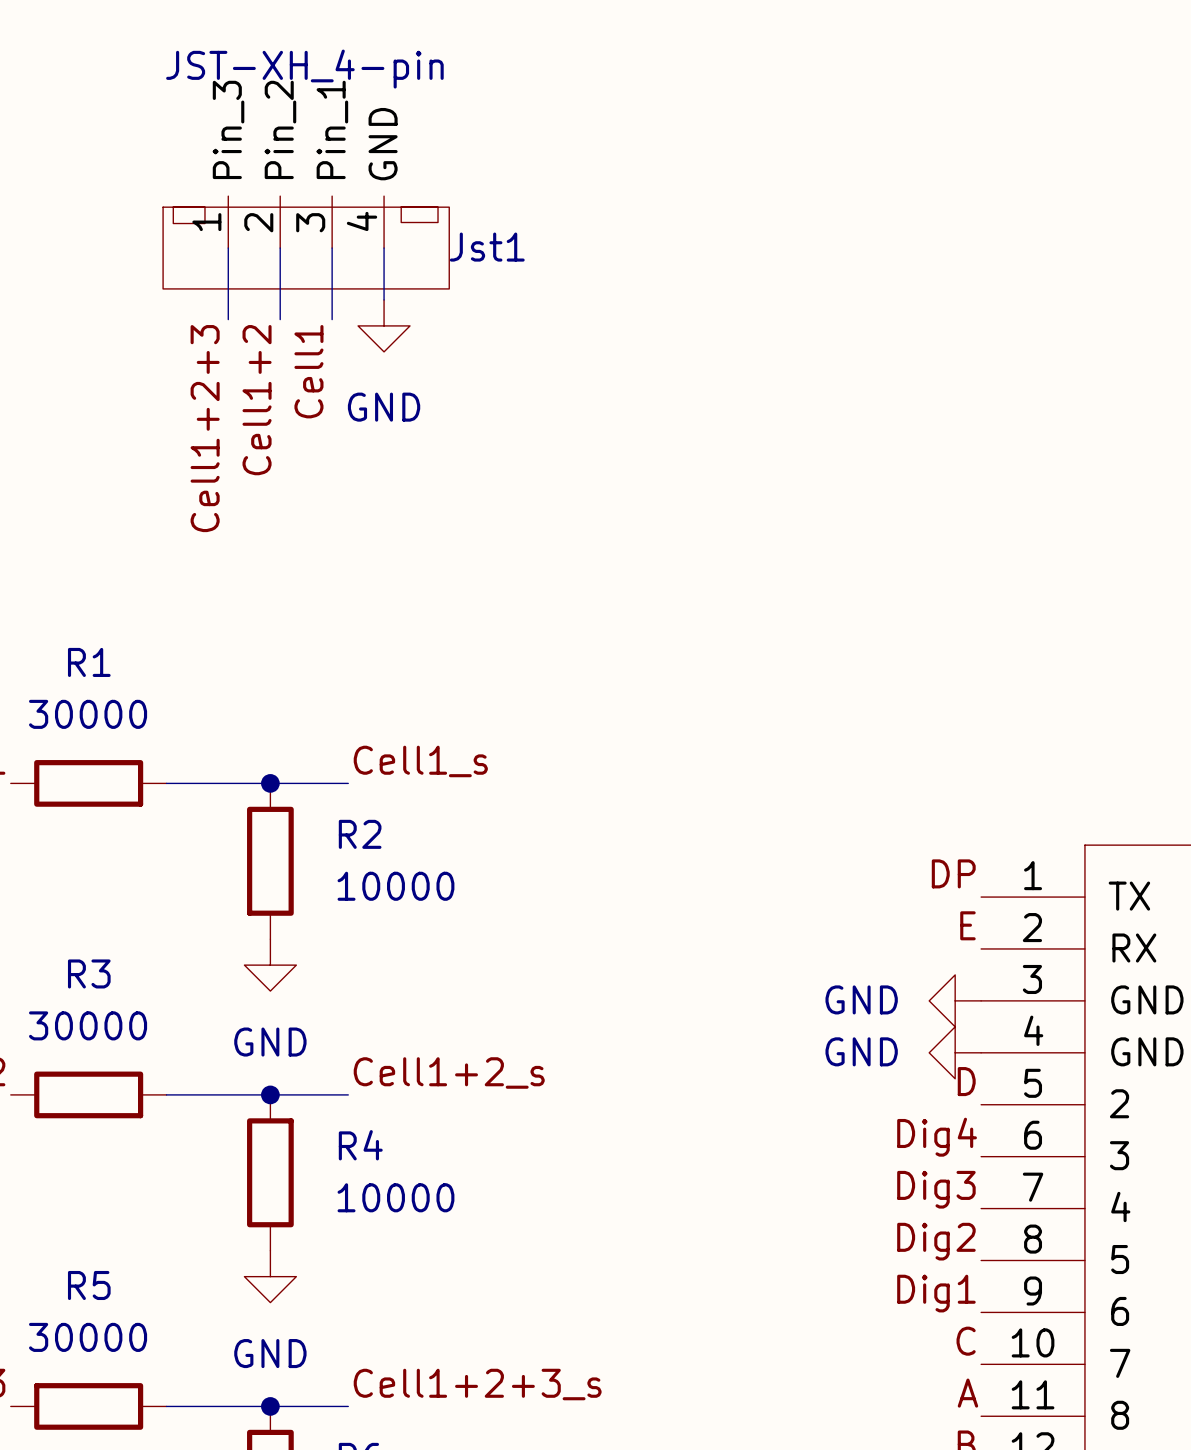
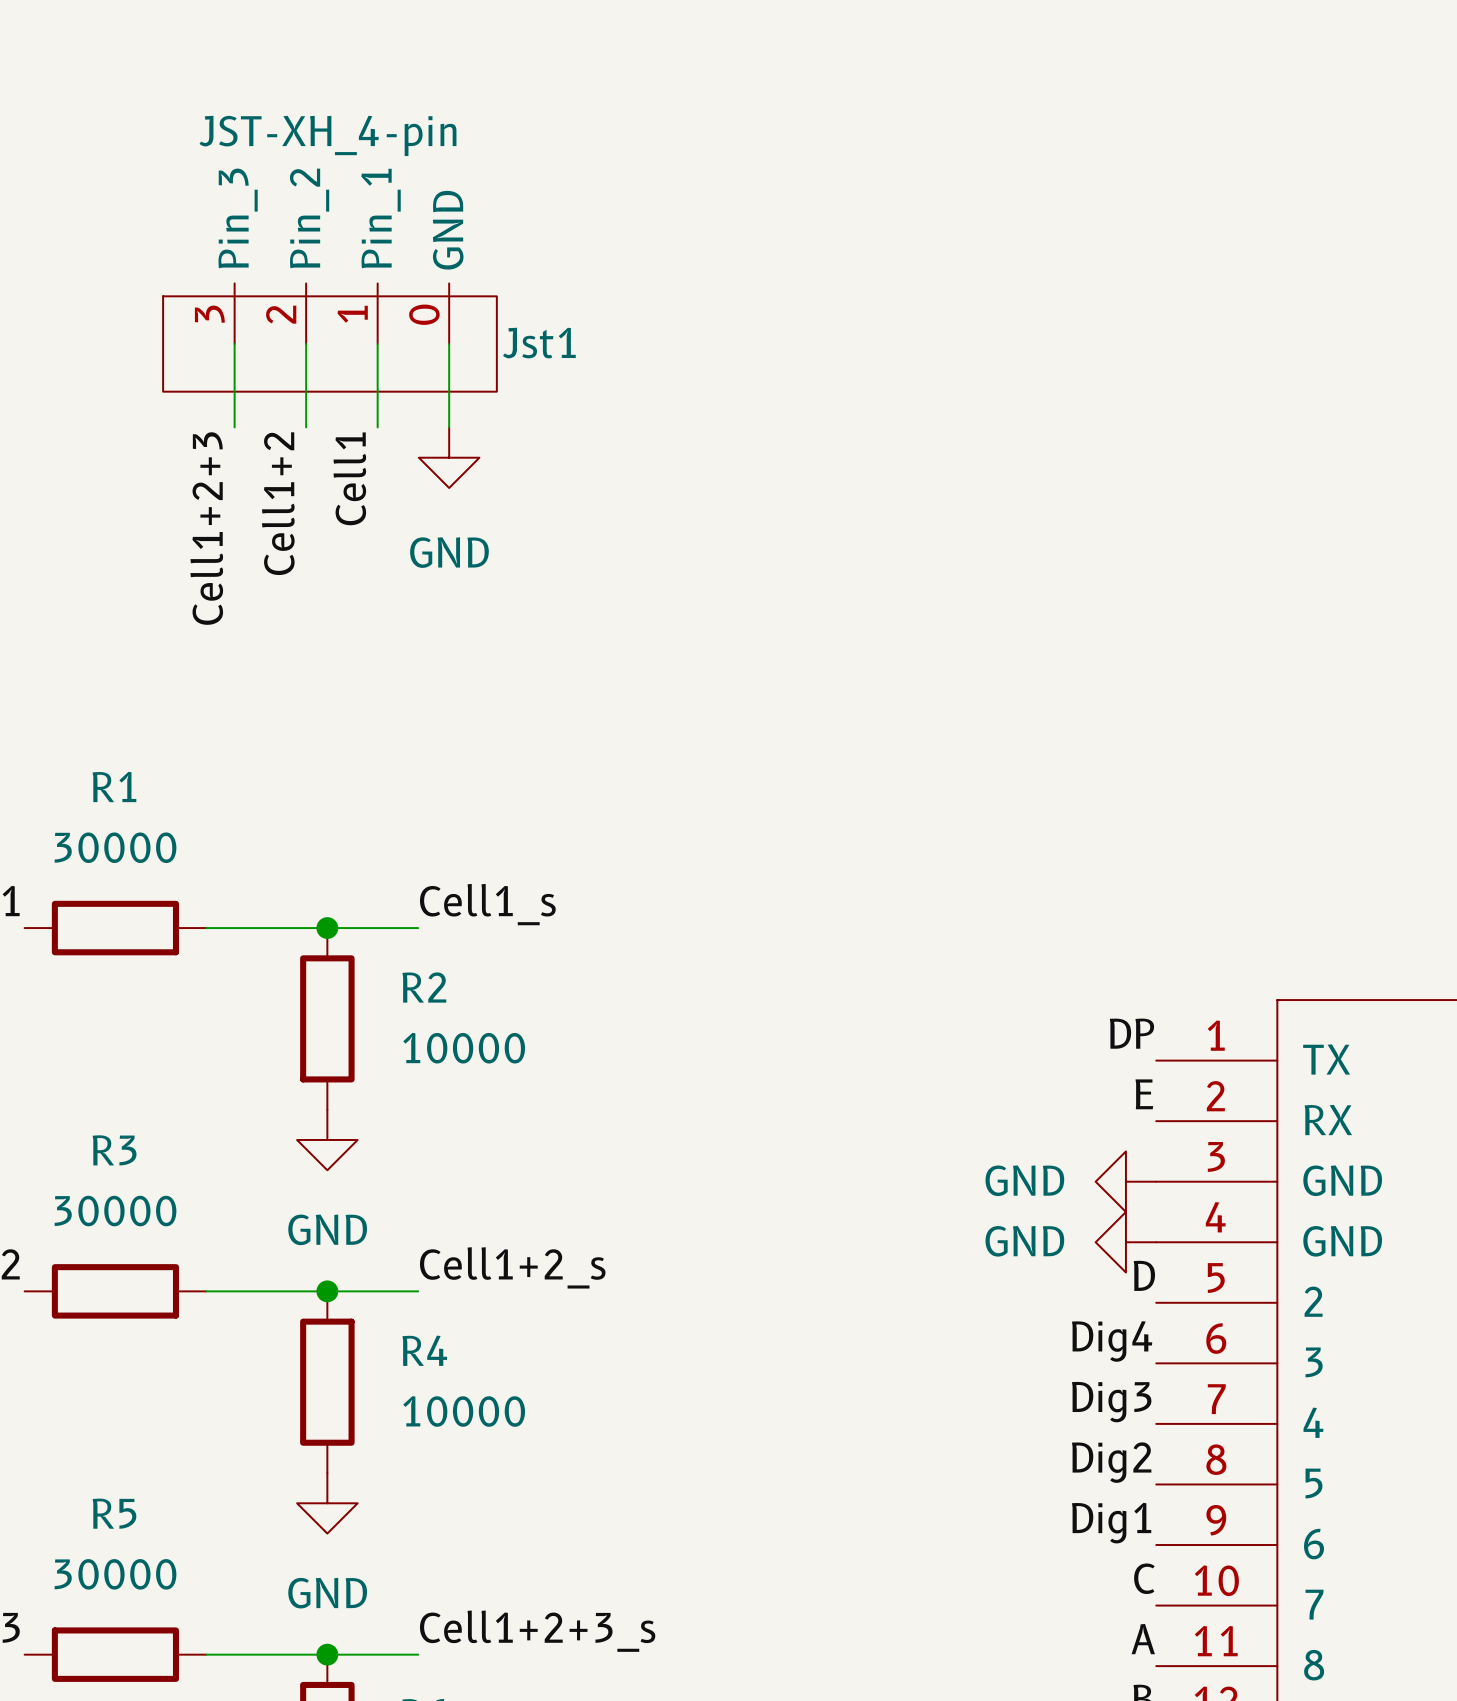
Jst1 symbol: [163, 196, 450, 289] -> [163, 283, 497, 392]
wire: (228, 248) (228, 319) -> (306, 344) (306, 427)
wire: (280, 248) (280, 319) -> (234, 344) (234, 427)
wire: (332, 248) (332, 319) -> (377, 344) (377, 427)
wire: (384, 248) (384, 299) -> none
wire: none -> (449, 344) (449, 427)
power symbol position: GND (384, 325) -> GND (449, 457)
label position: Cell1 (308, 371) -> Cell1 (349, 478)
label position: Cell1+2 (257, 400) -> Cell1+2 (278, 503)
label position: Cell1+2+3 (205, 428) -> Cell1+2+3 (206, 528)

